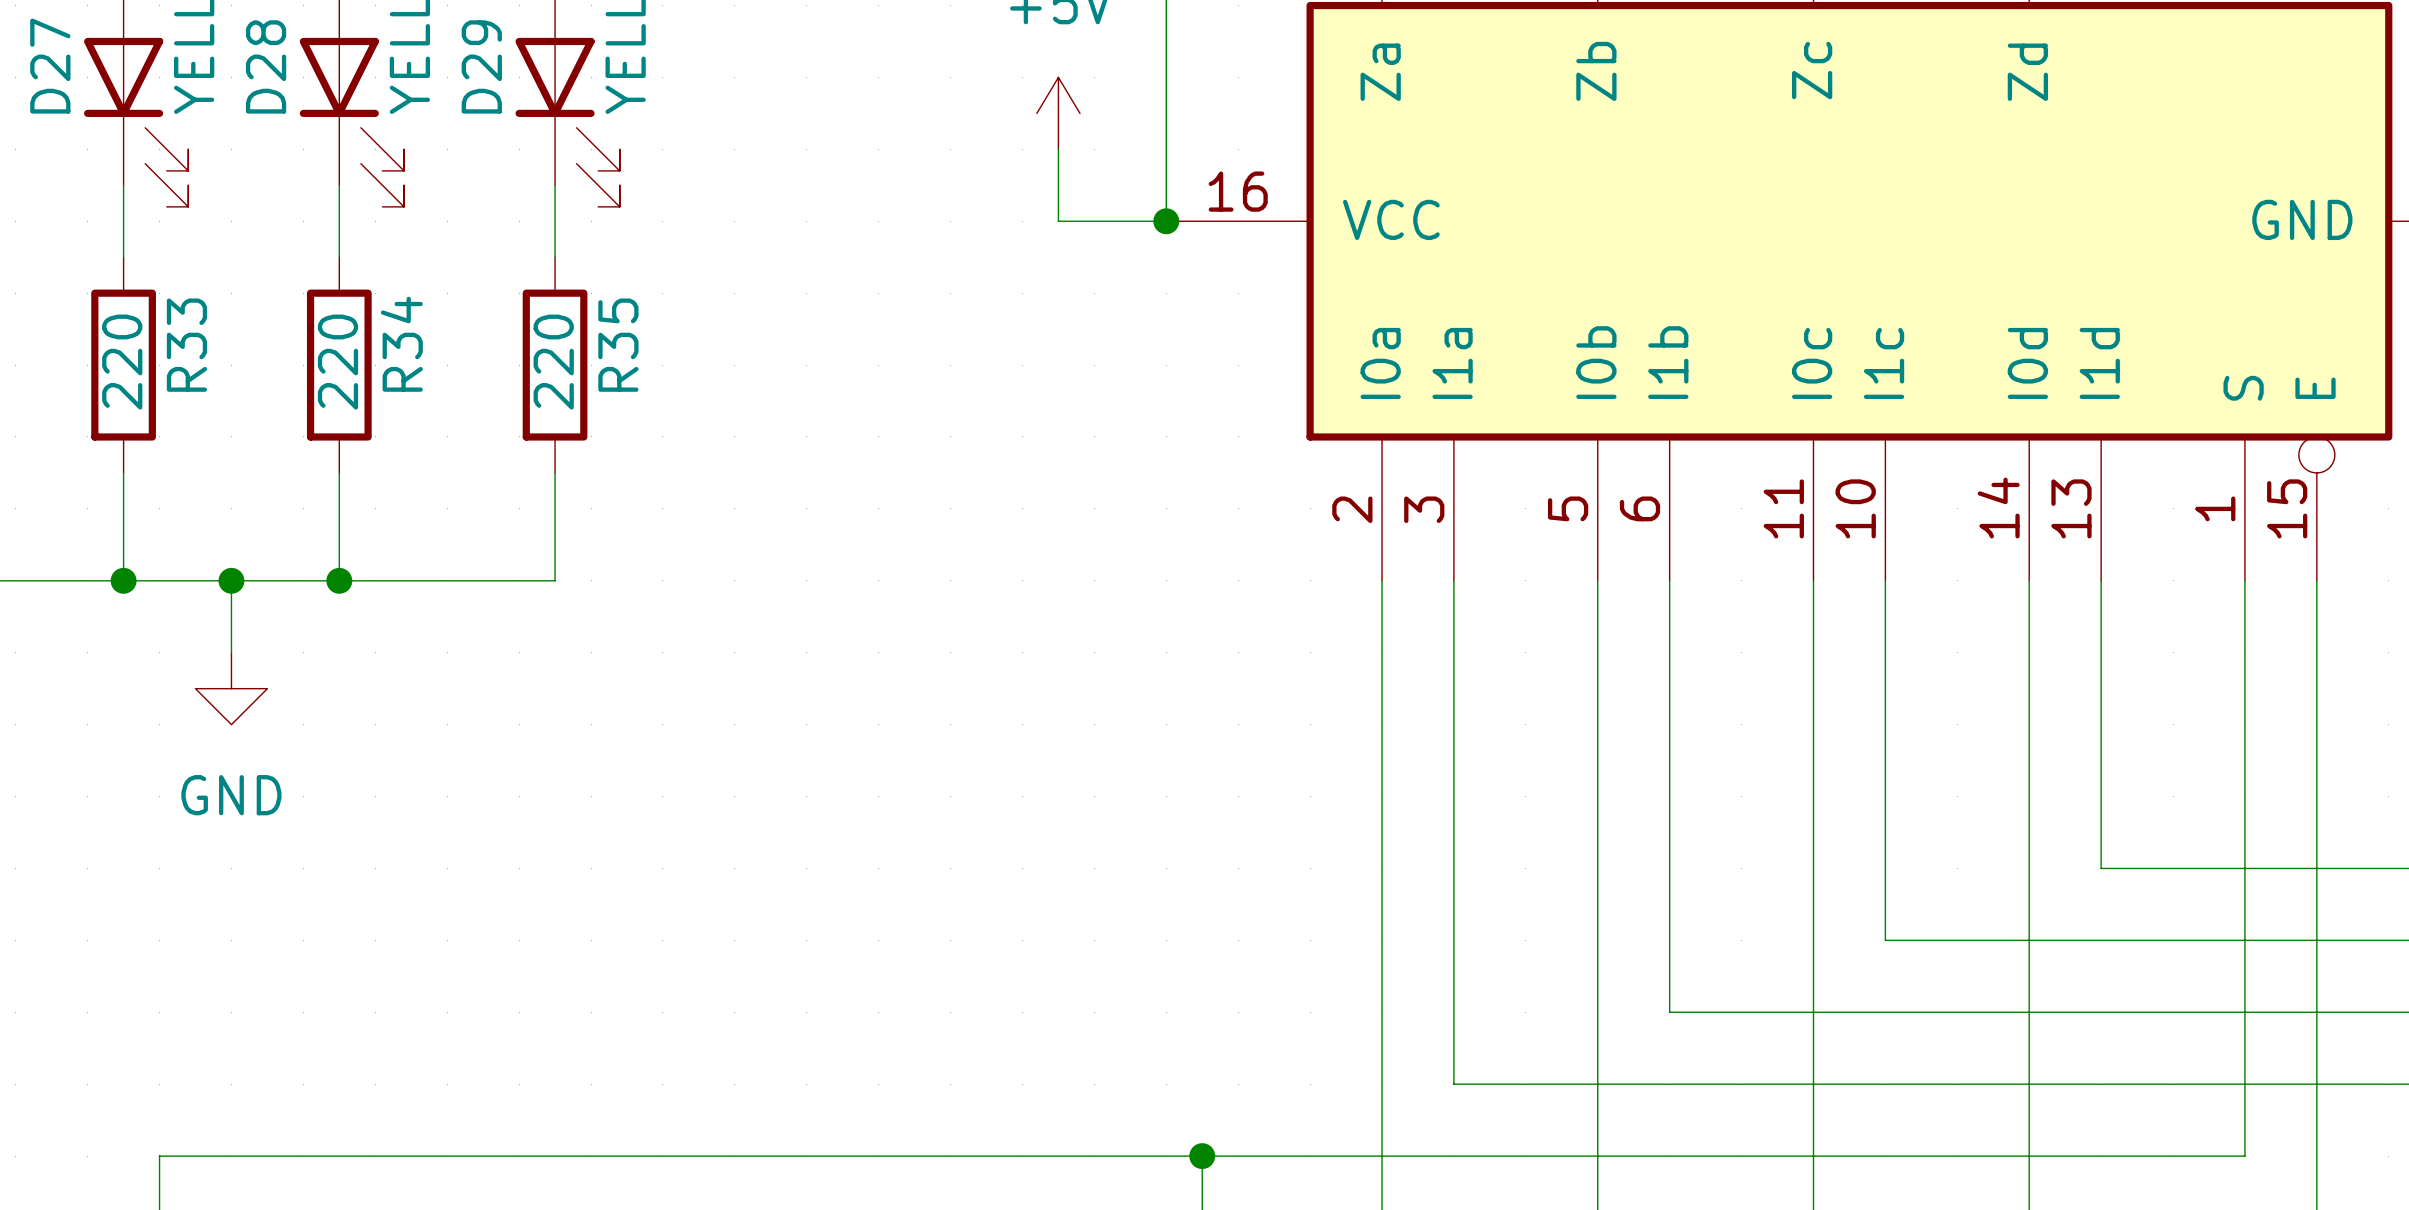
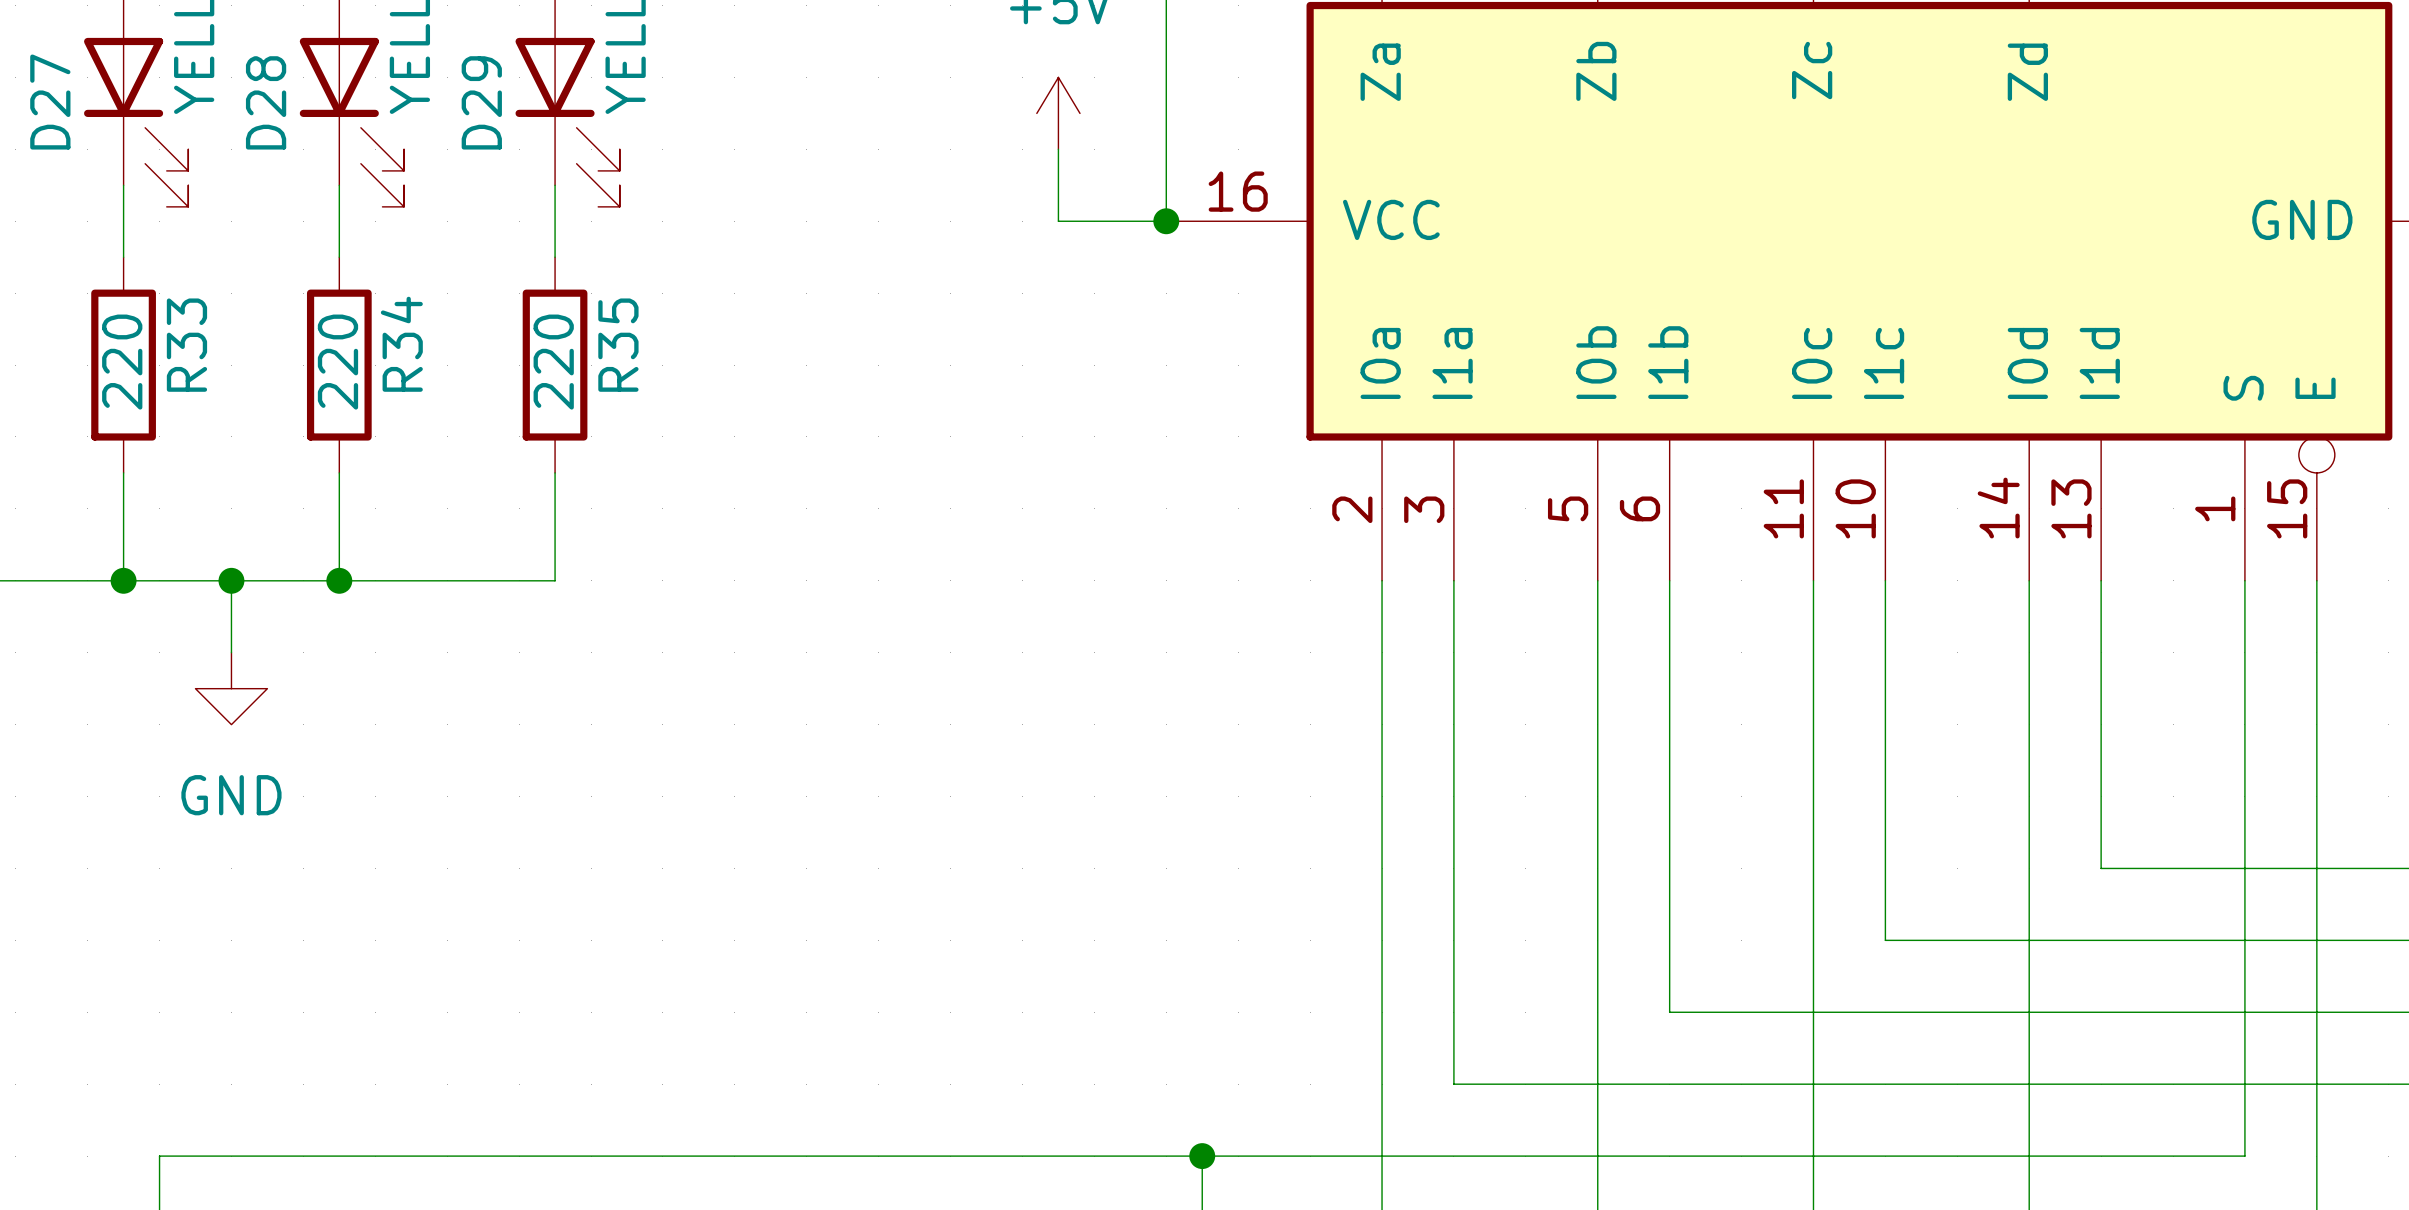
D27 name position: D27 (50, 66) -> D27 (50, 102)
D28 name position: D28 (266, 66) -> D28 (266, 102)
D29 name position: D29 (481, 66) -> D29 (481, 102)

